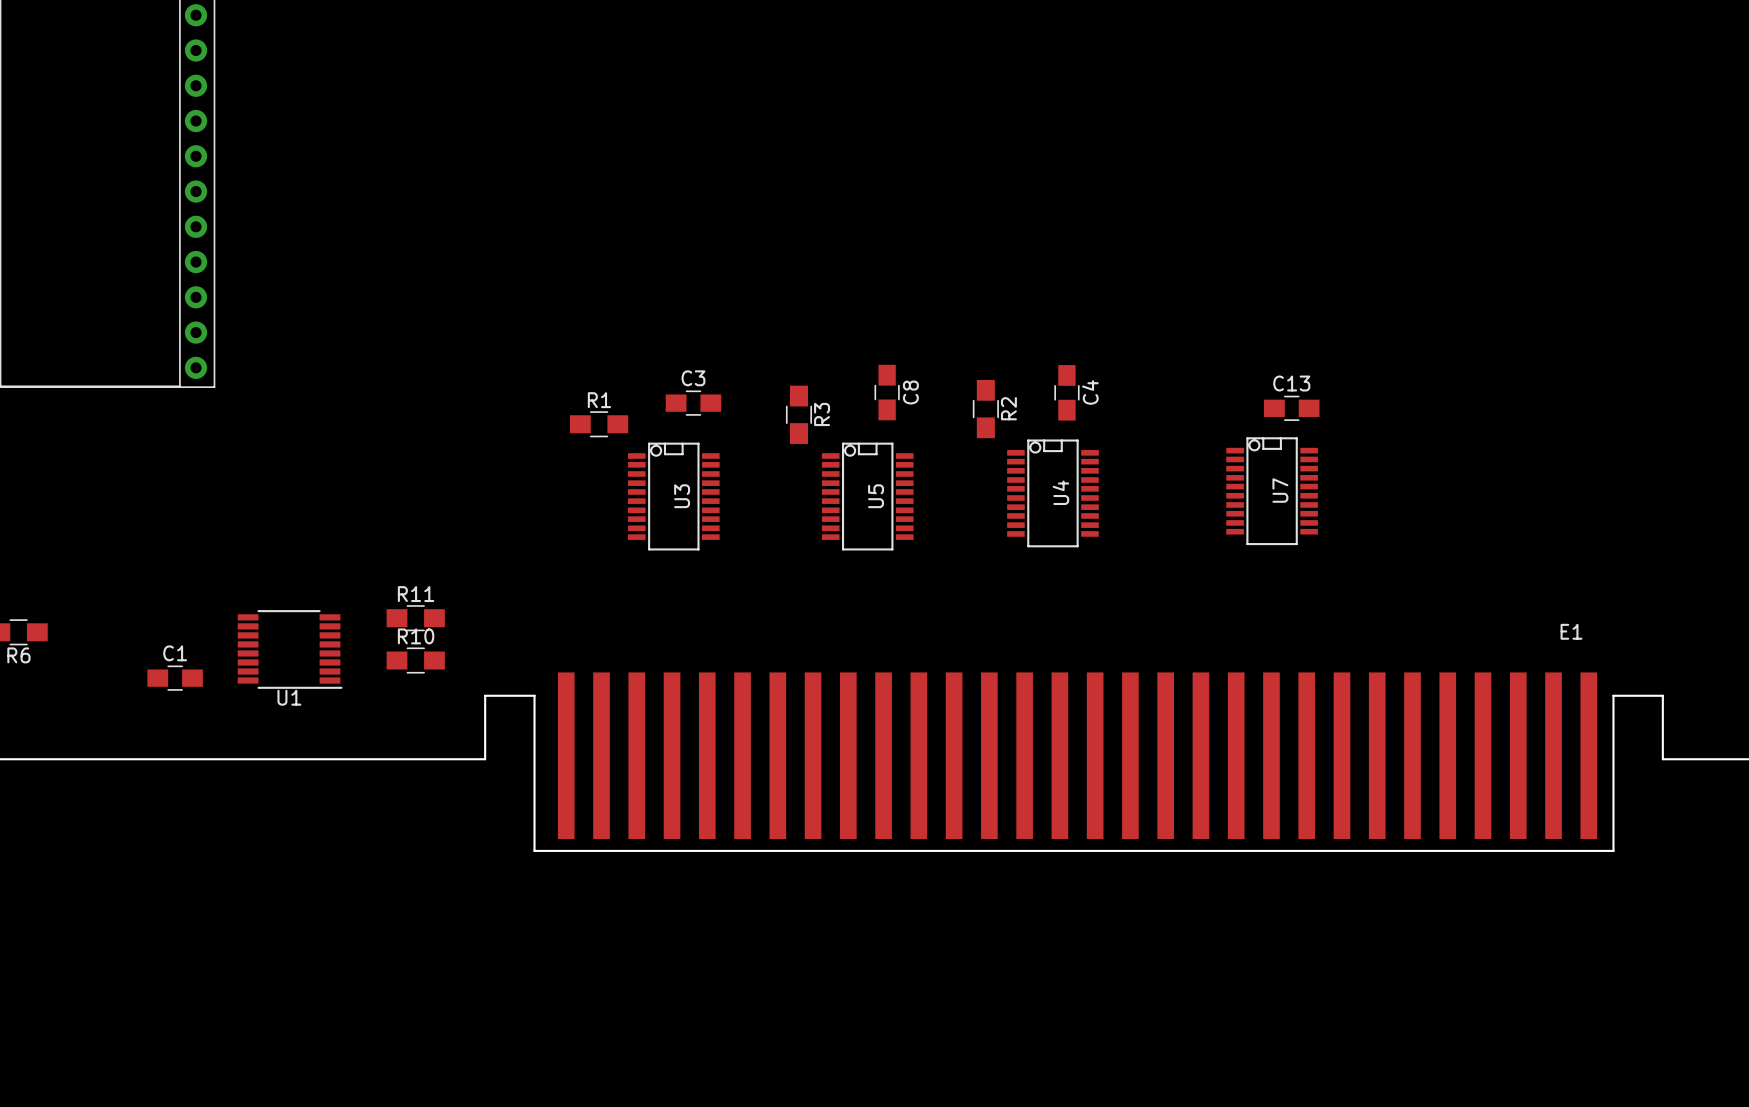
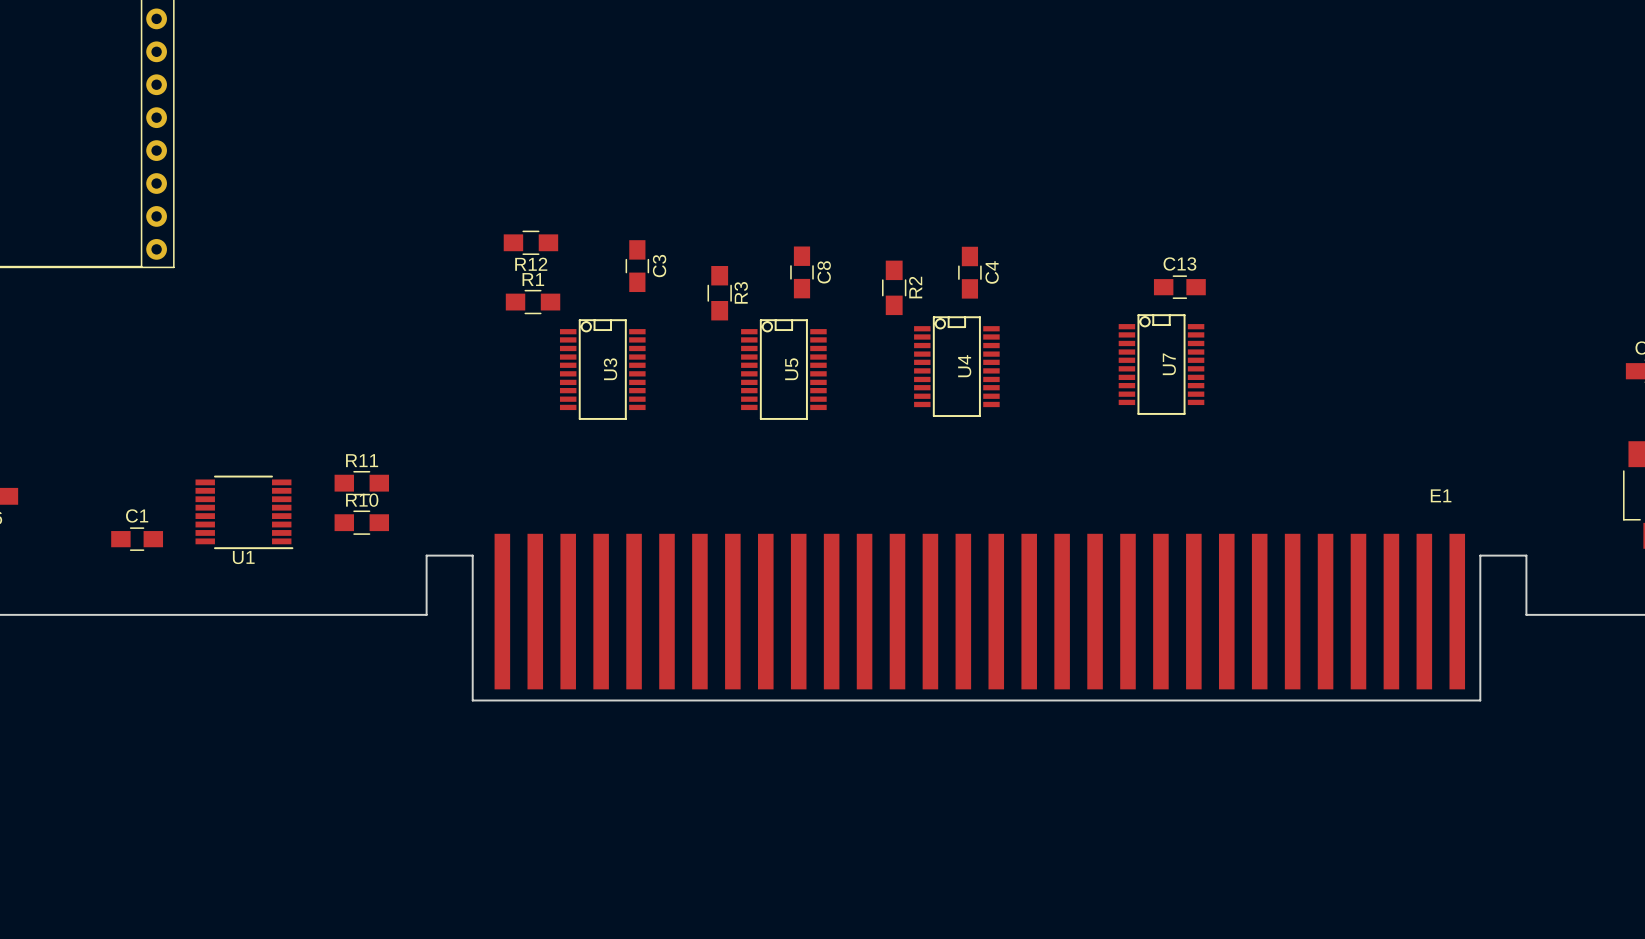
R12: none -> (530, 242)
C3 rotation: 0° (693, 403) -> 90° clockwise (637, 266)

